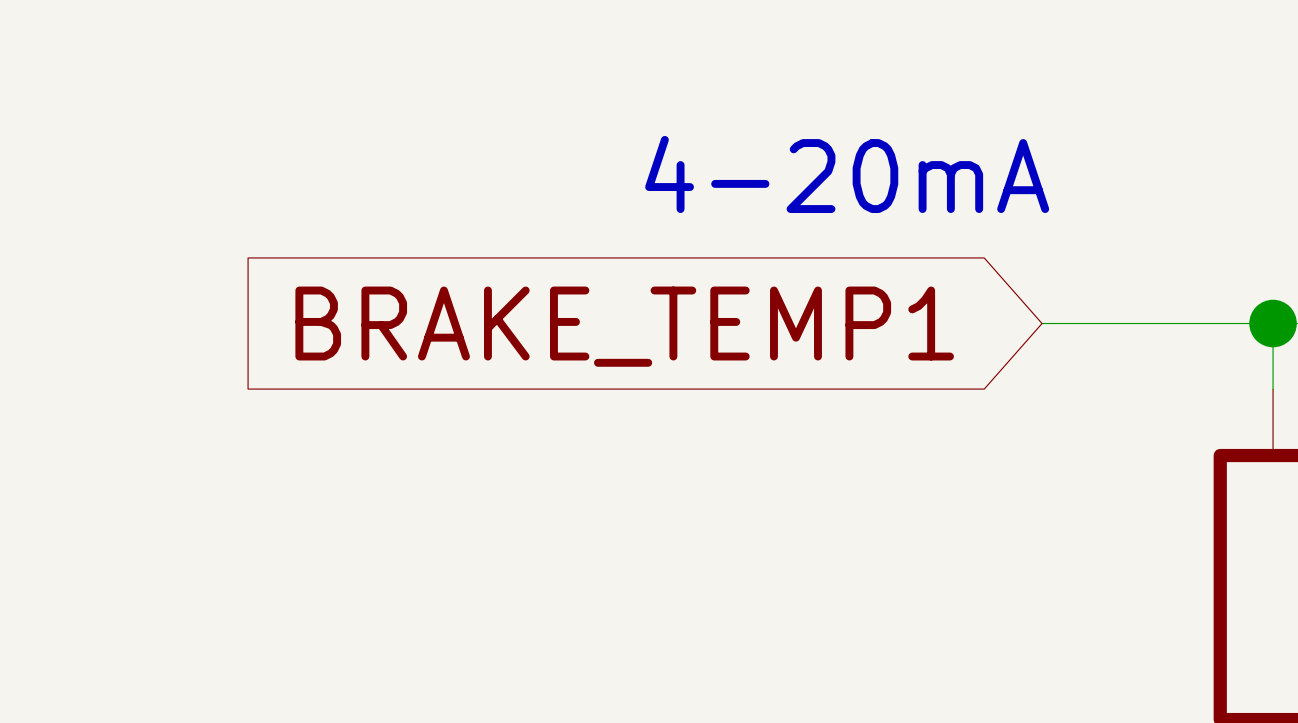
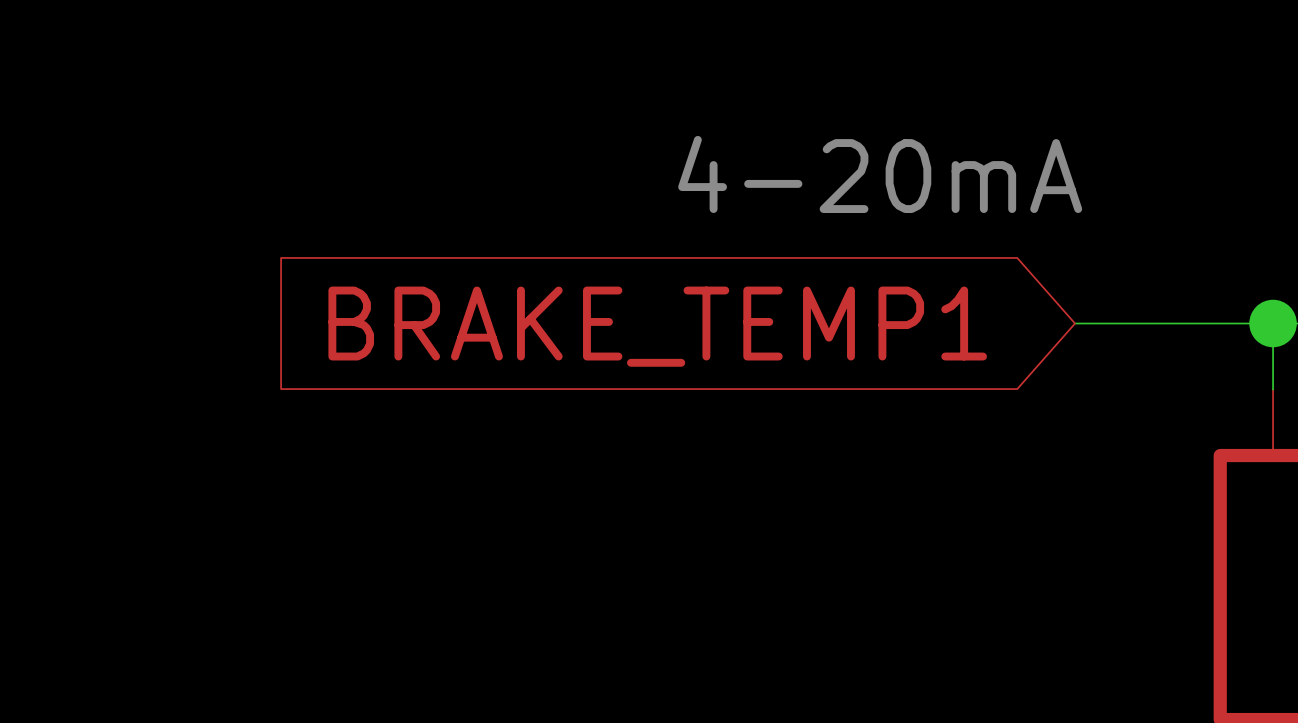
text position: 4-20mA (847, 174) -> 4-20mA (880, 174)
wire: (1042, 323) (1075, 323) -> none
global label position: BRAKE_TEMP1 (624, 326) -> BRAKE_TEMP1 (657, 326)

